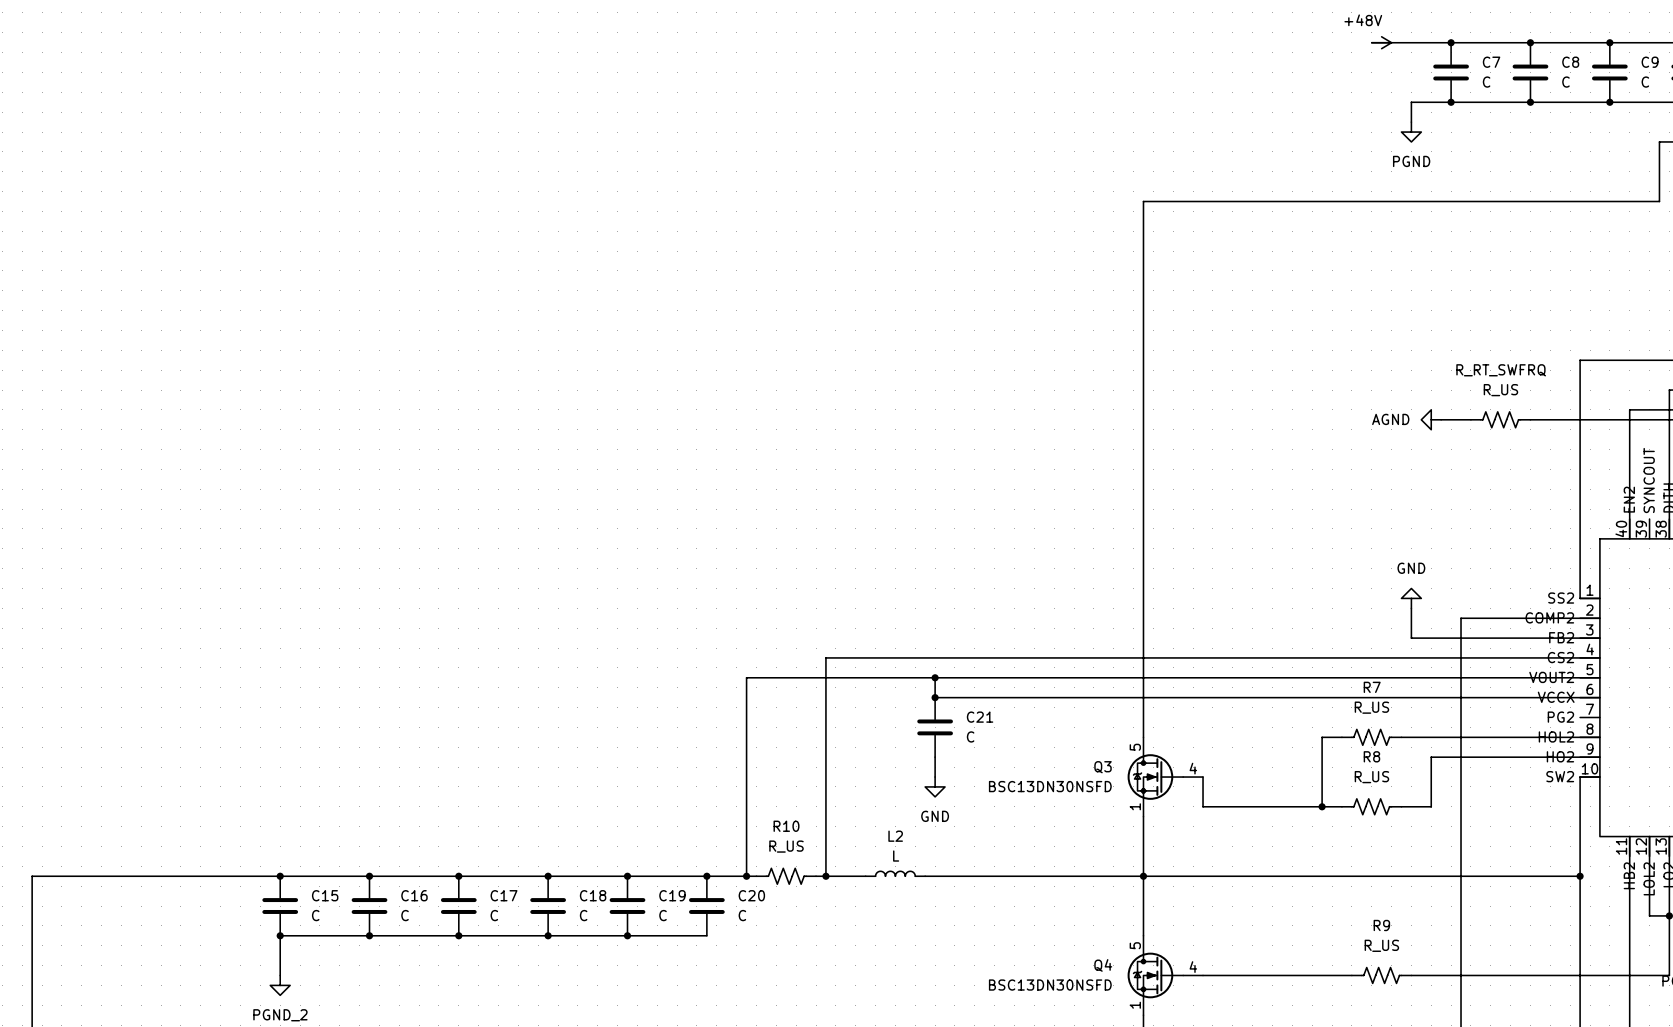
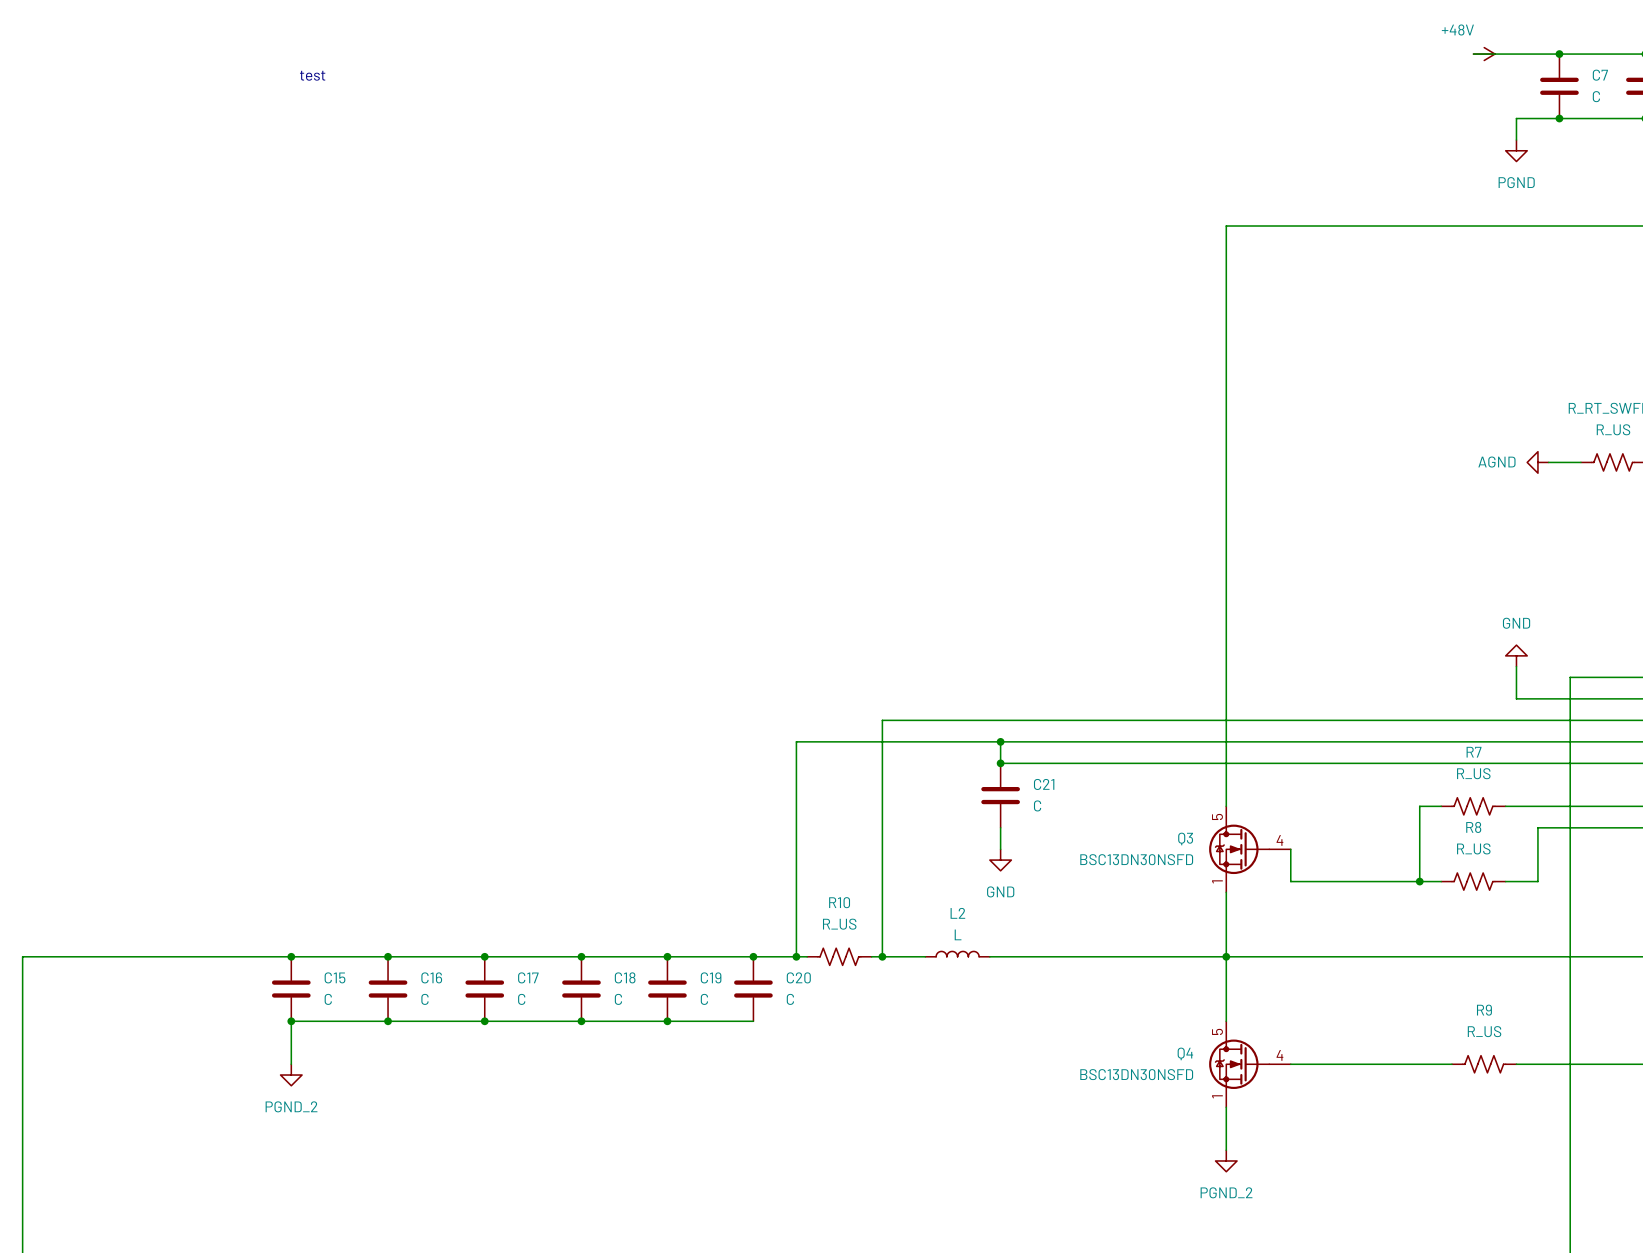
text: none -> test (312, 75)

